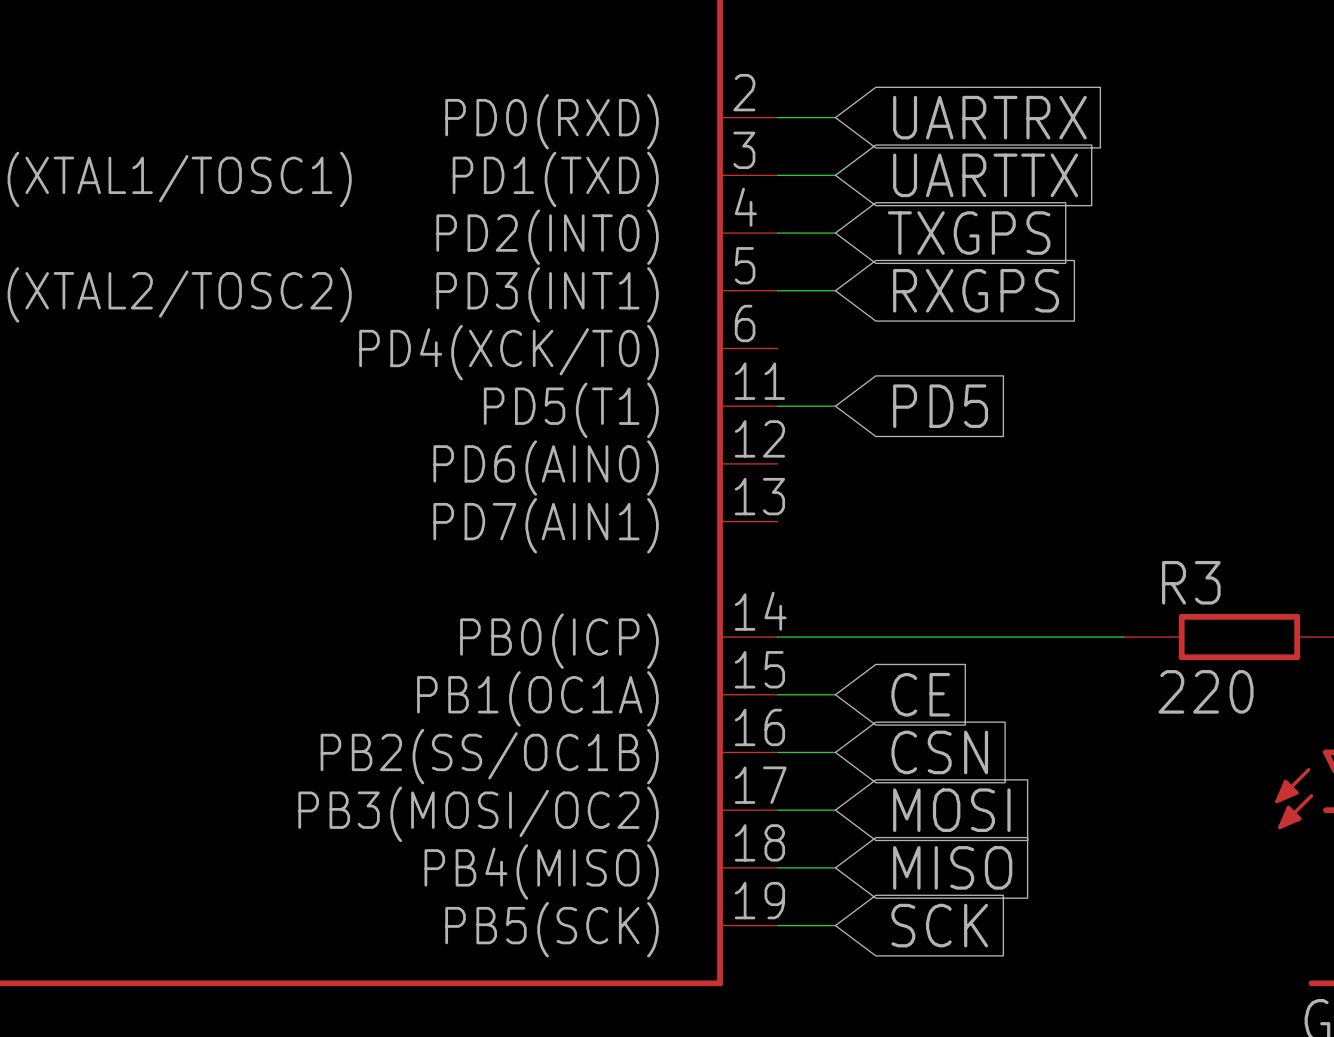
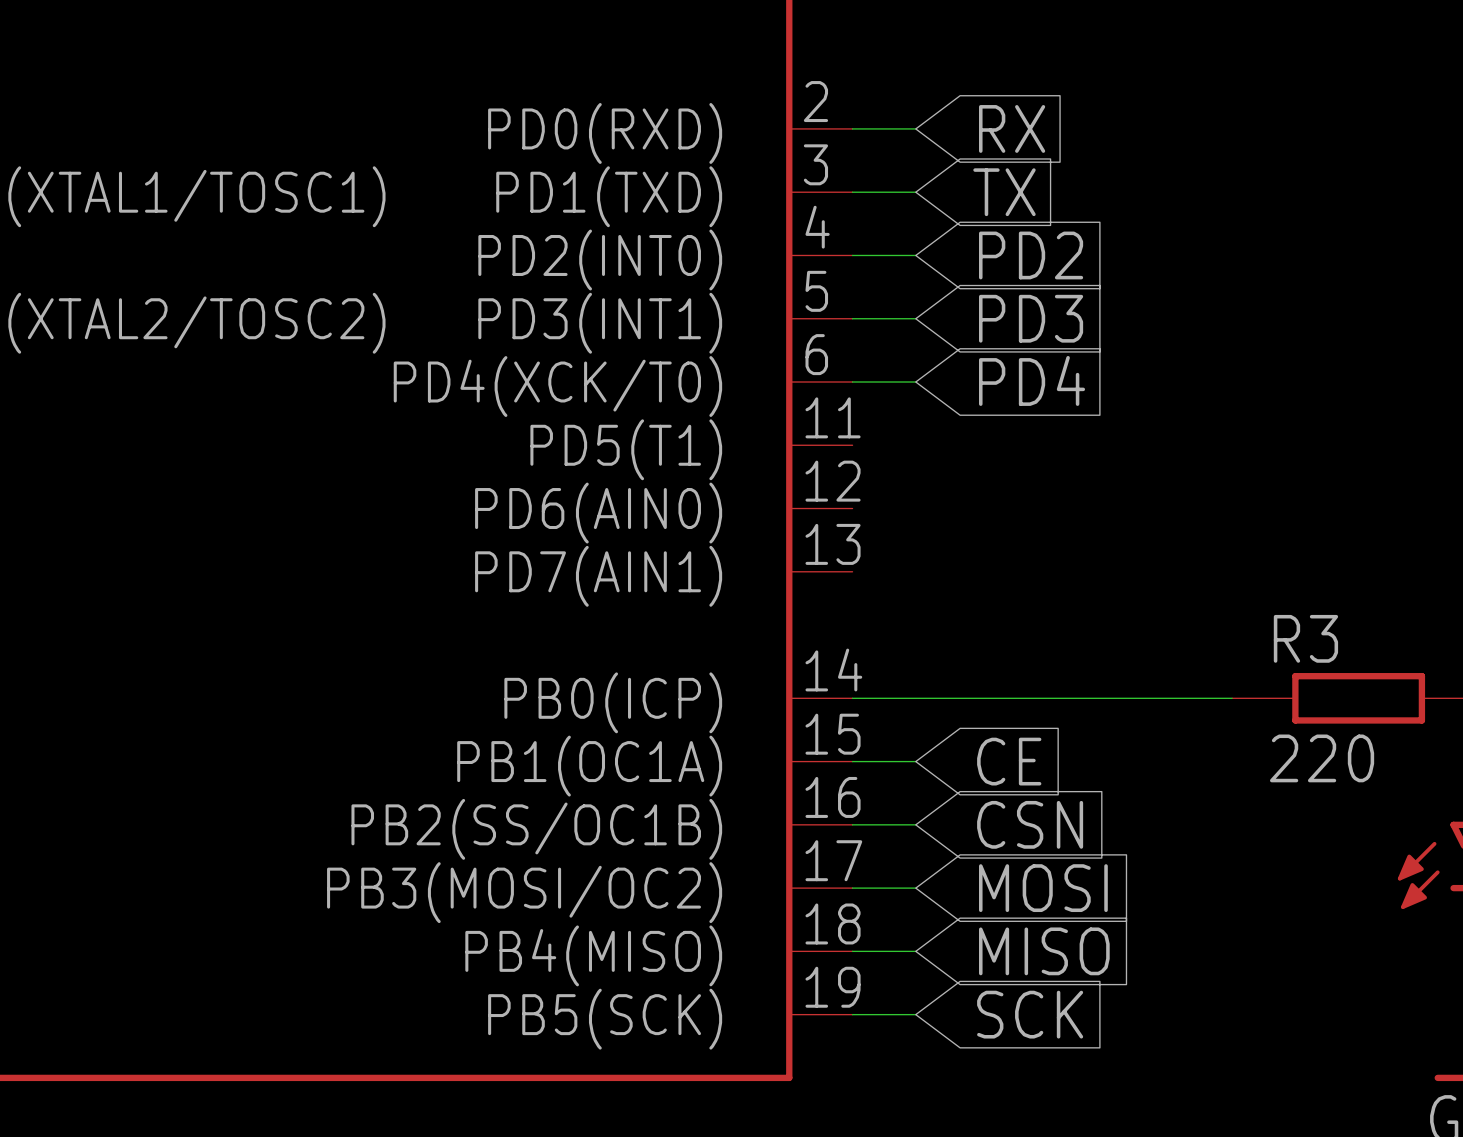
global label: UARTRX (989, 117) -> RX (1012, 128)
global label: UARTTX (985, 175) -> TX (1004, 192)
global label: TXGPS (969, 233) -> PD2 (1031, 255)
global label: RXGPS (976, 290) -> PD3 (1031, 318)
wire: (777, 406) (835, 406) -> (852, 382) (915, 382)
global label: PD5 (940, 406) -> PD4 (1032, 380)

